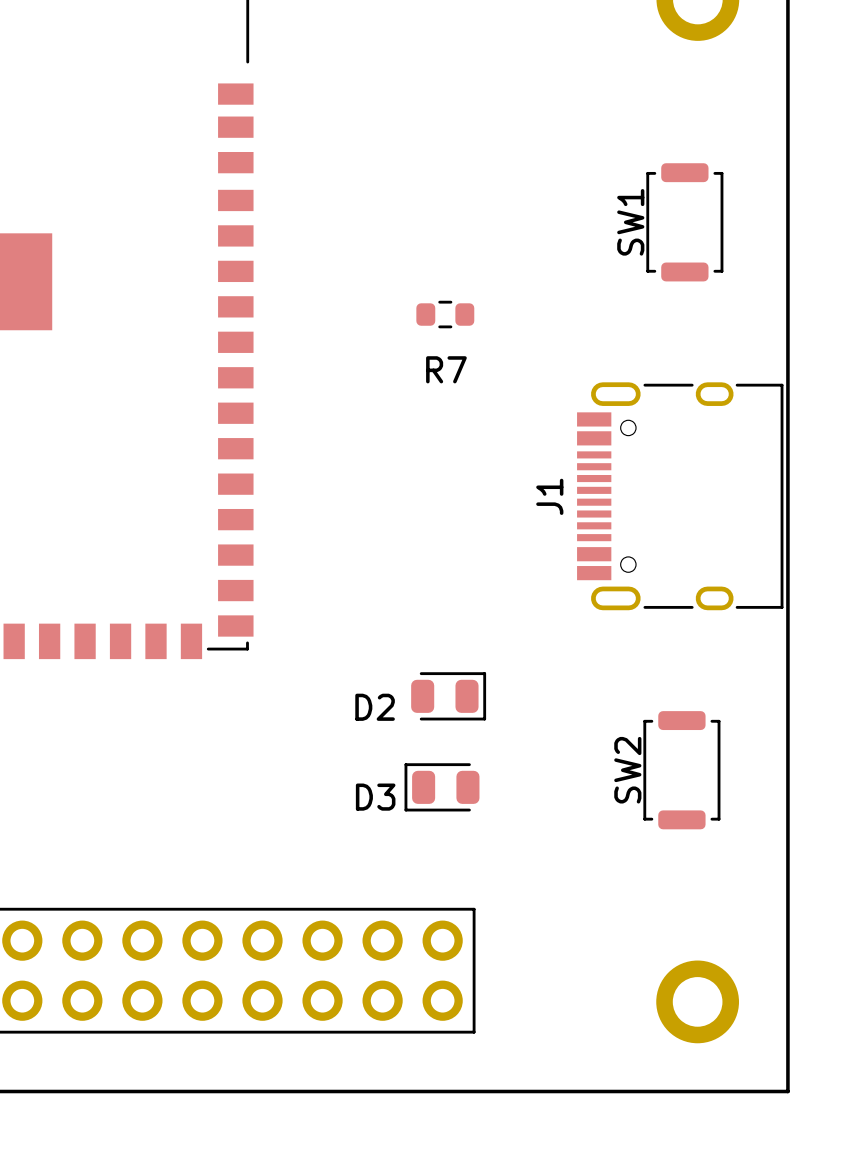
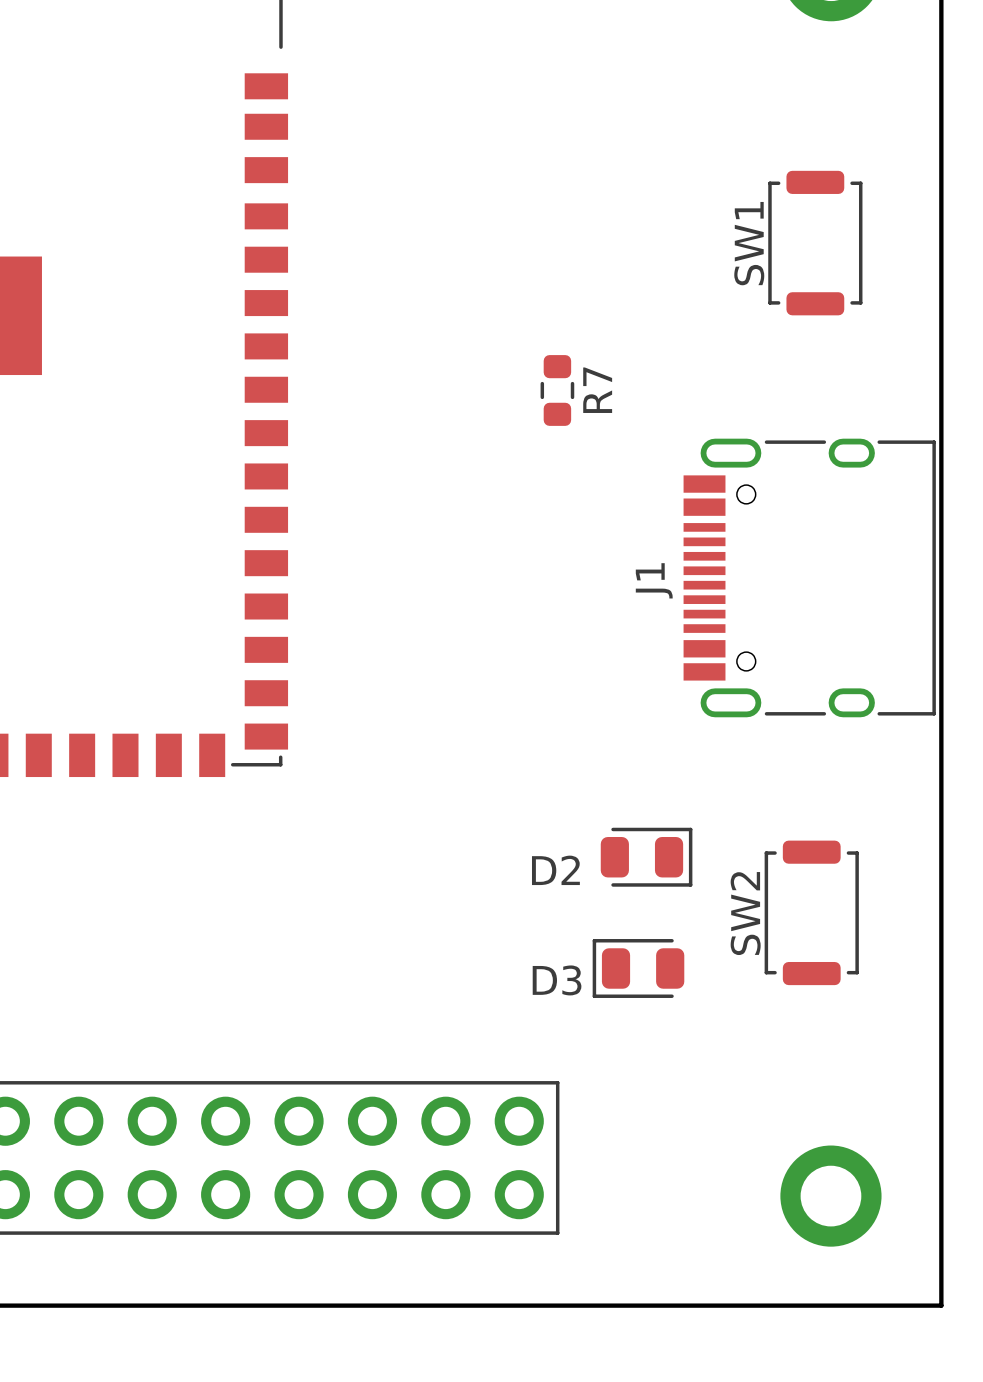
R7 rotation: 0° (445, 314) -> 90° clockwise (557, 390)
R7 position: (445, 314) -> (557, 390)
R7 name position: R7 (446, 369) -> R7 (597, 390)
D2 position: (448, 696) -> (646, 857)
D3 position: (442, 787) -> (638, 968)

